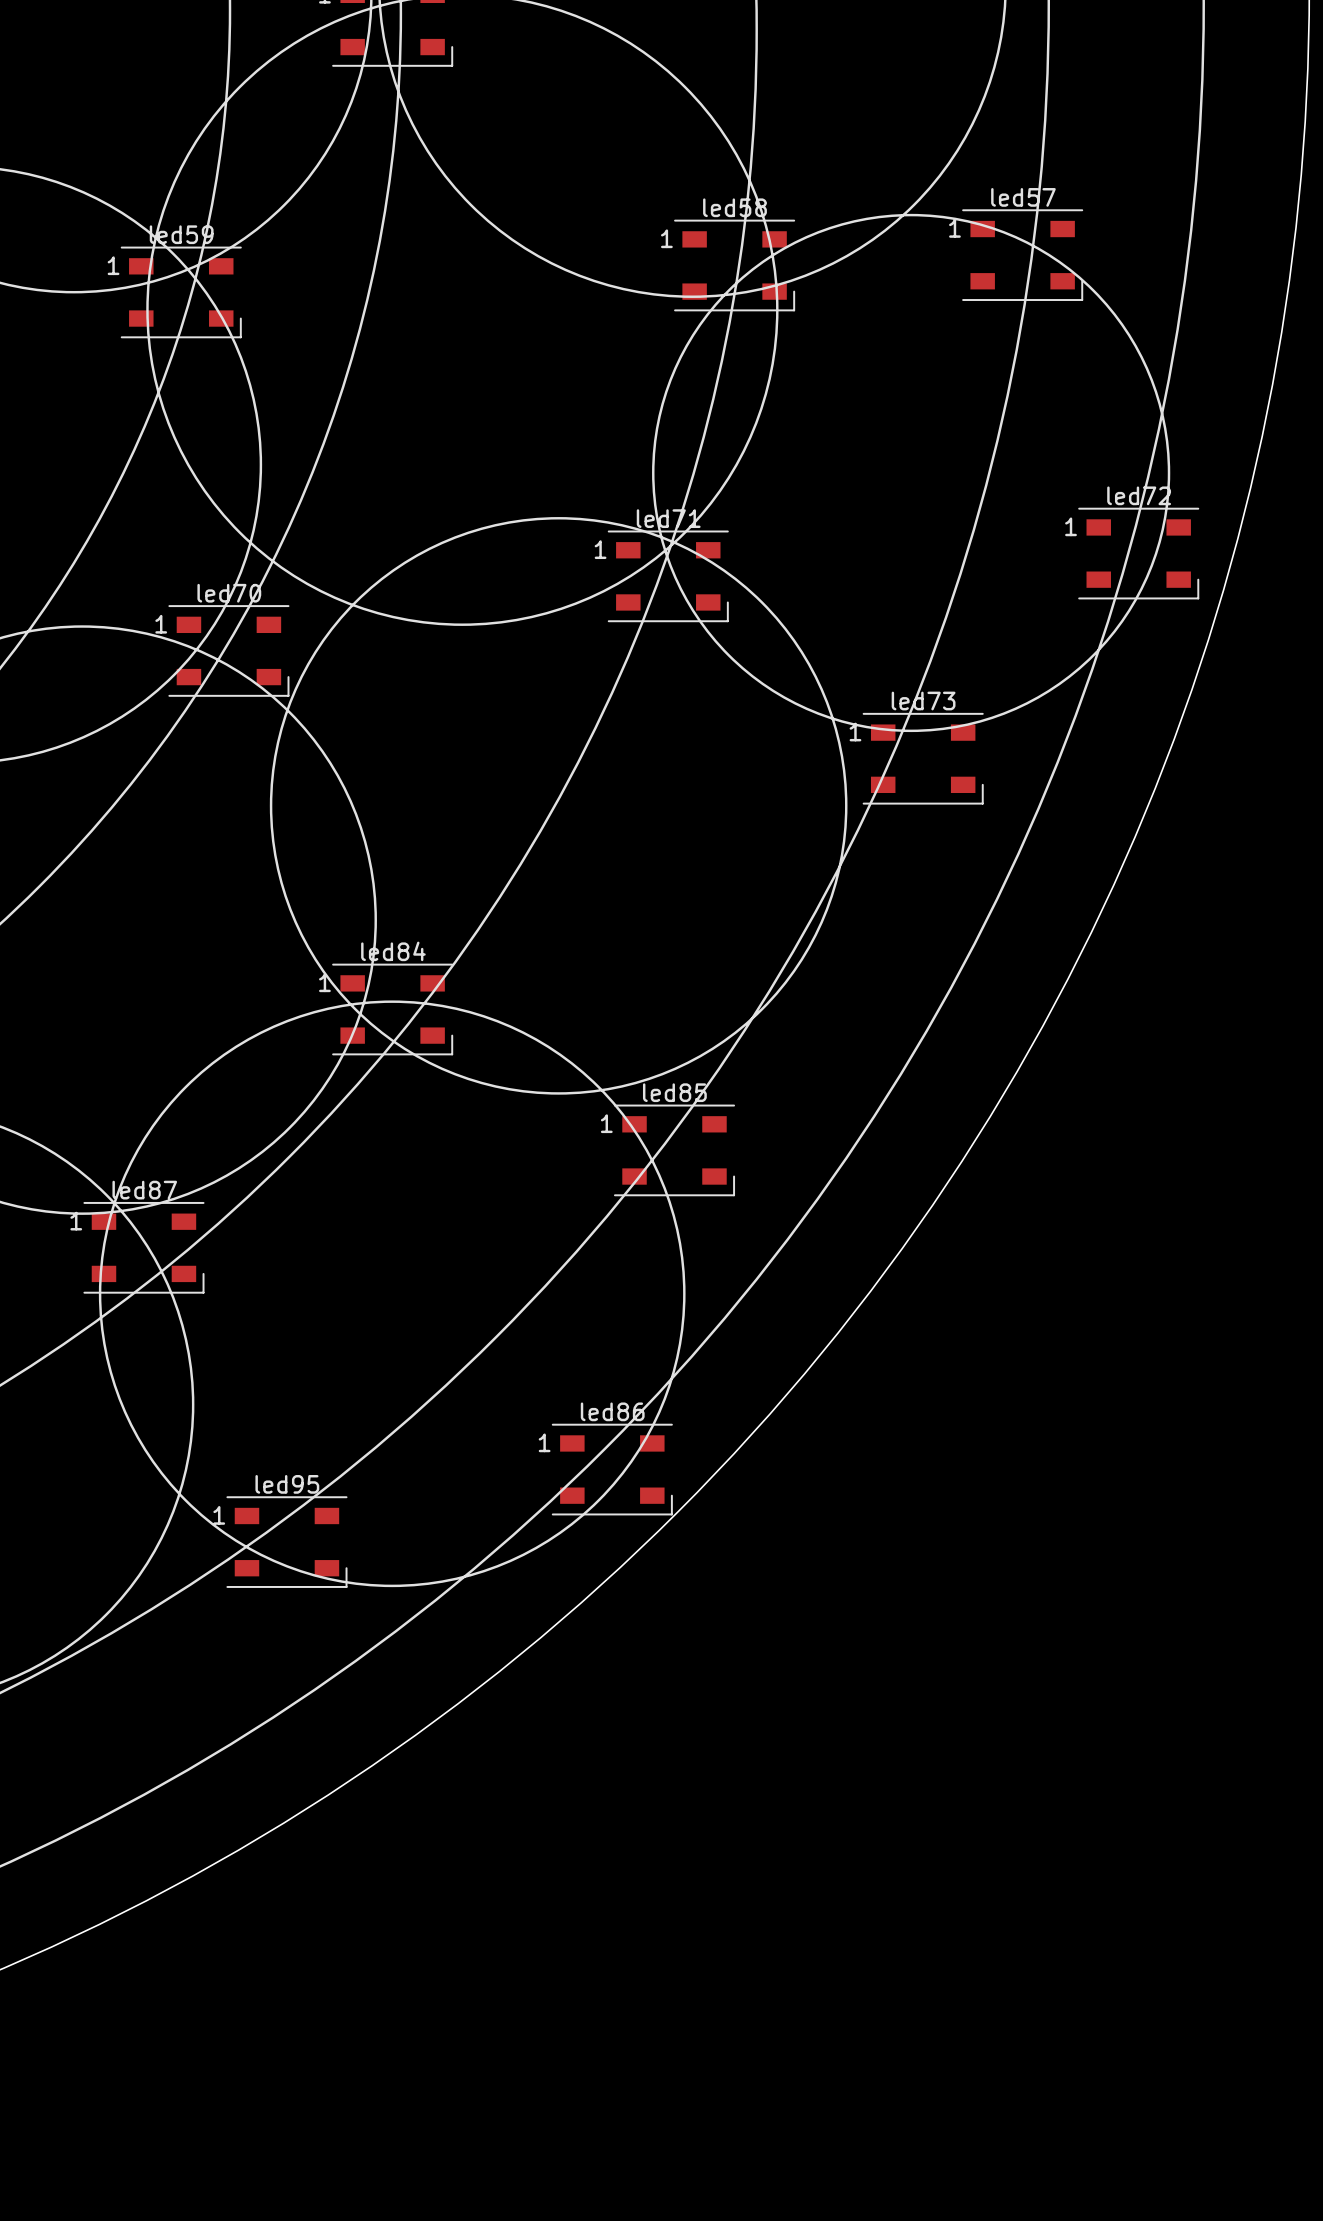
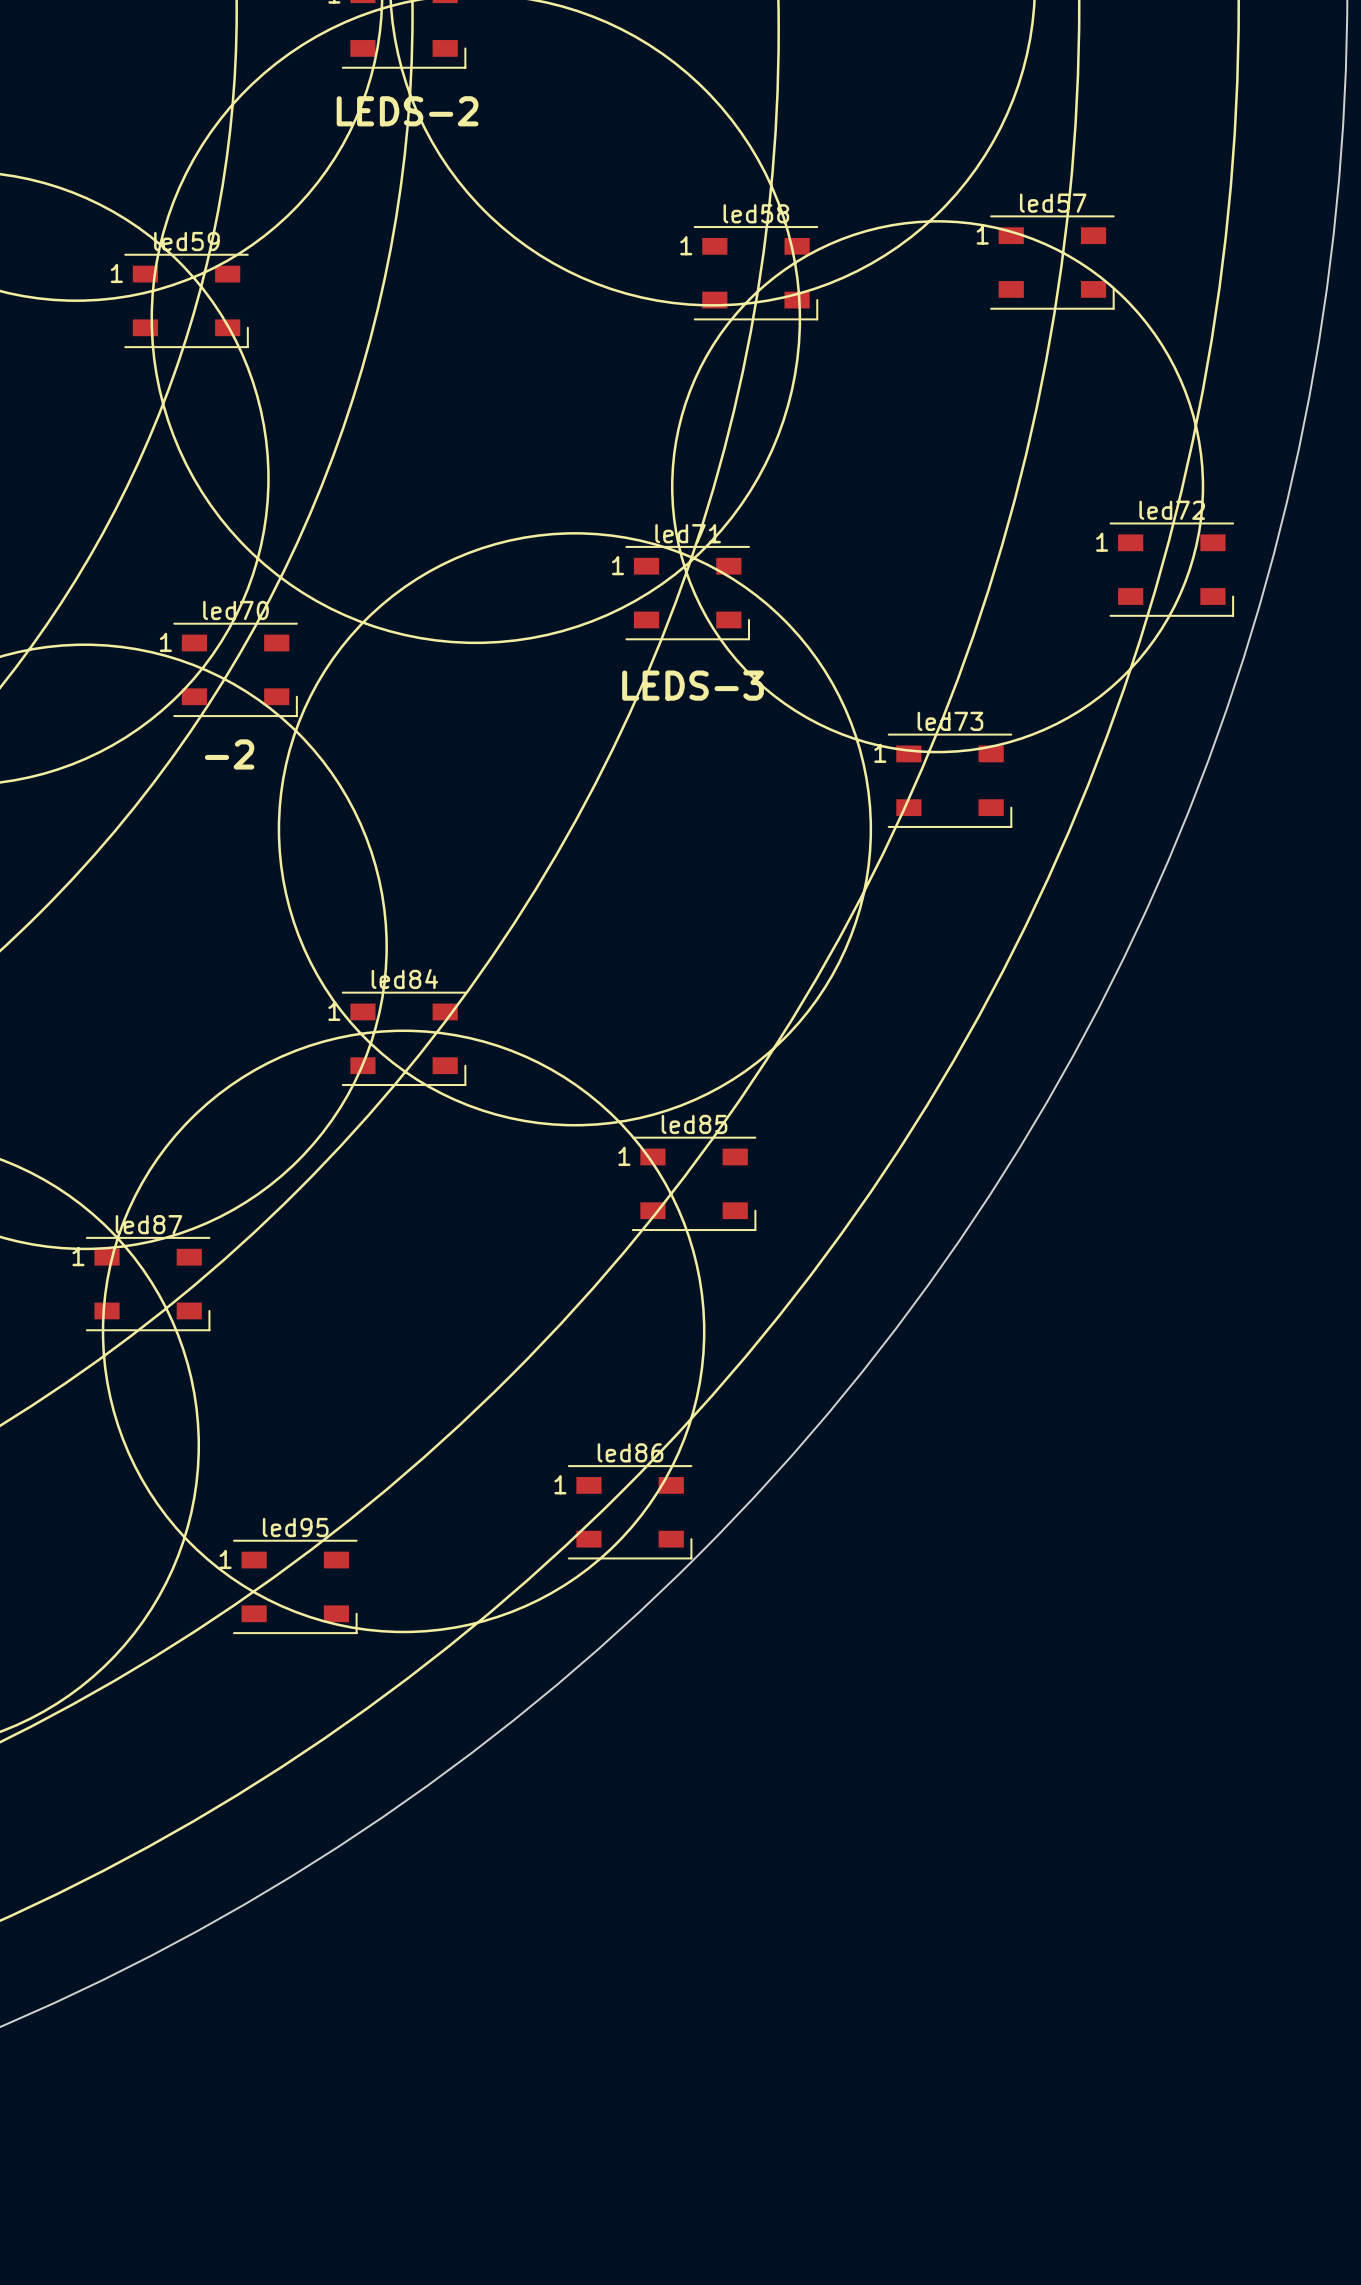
text: none -> LEDS-2 (407, 111)
text: none -> LEDS-3 (693, 685)
text: none -> -2 (229, 754)

